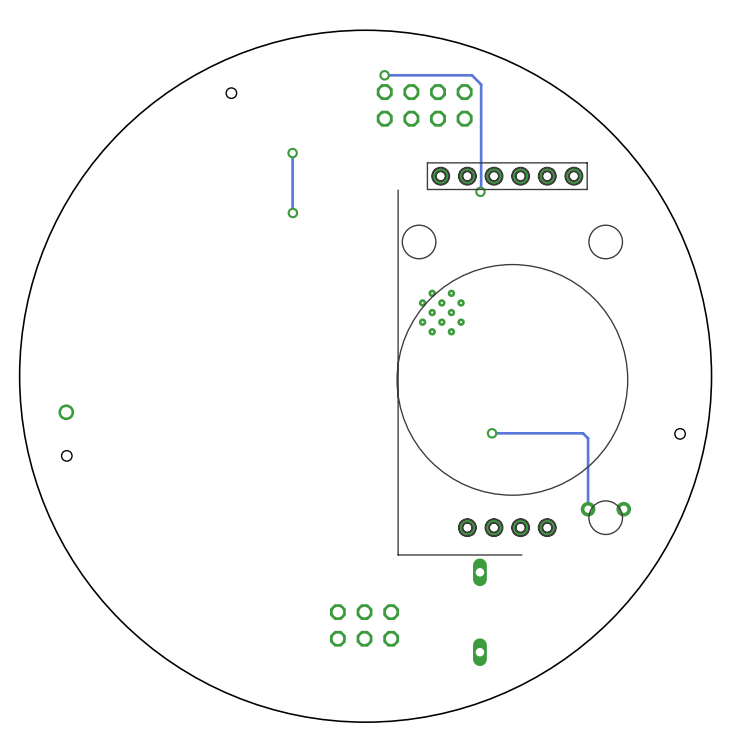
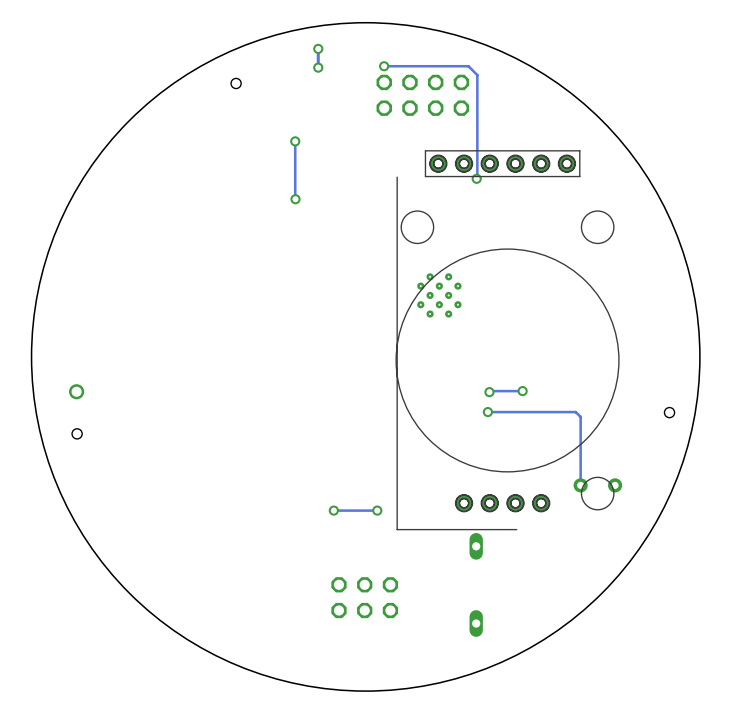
track: none -> (318, 48) (318, 67)
via: none -> (318, 48)
via: none -> (318, 67)
track: none -> (522, 391) (489, 392)
via: none -> (522, 391)
via: none -> (489, 392)
via: none -> (333, 510)
track: none -> (377, 510) (333, 510)
via: none -> (377, 510)

